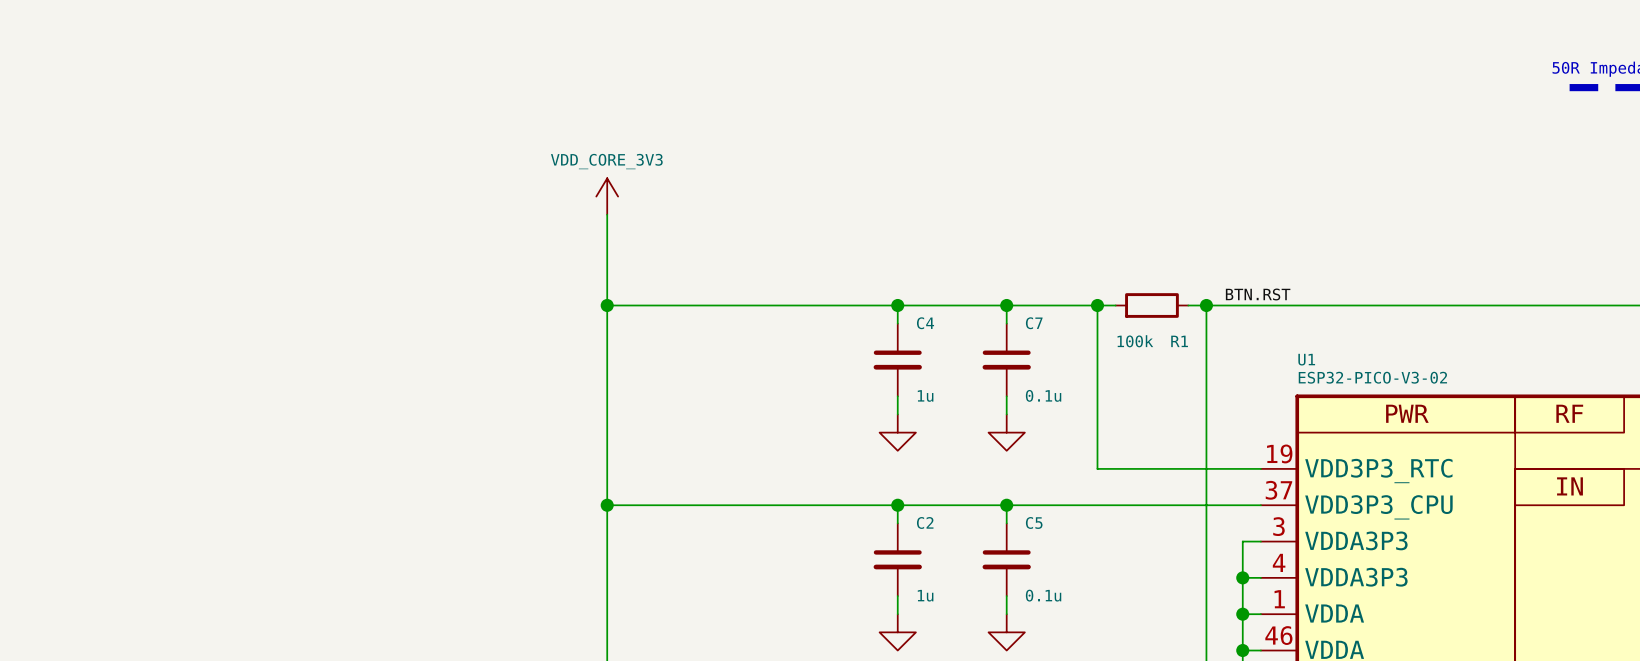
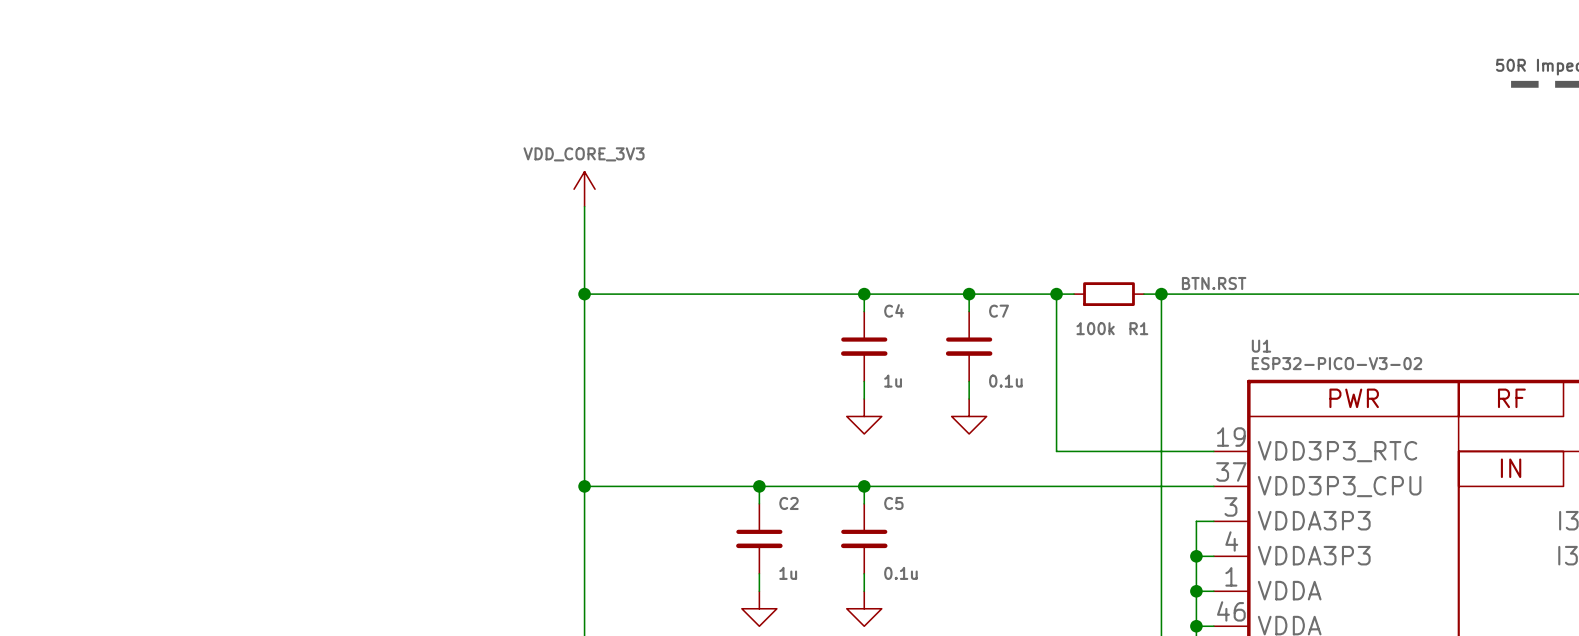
junction: none -> (759, 486)
wire: (1006, 505) (1006, 523) -> (759, 486) (759, 503)
junction: (1006, 505) -> none
C2 name: C2 (925, 522) -> C5 (893, 503)
C2: none -> 1u (759, 538)
C5: 0.1u (1006, 559) -> none
C2 value: 1u (925, 595) -> 0.1u (900, 573)
wire: (1006, 596) (1006, 614) -> (759, 573) (759, 591)
power symbol position: (1006, 632) -> (759, 608)

